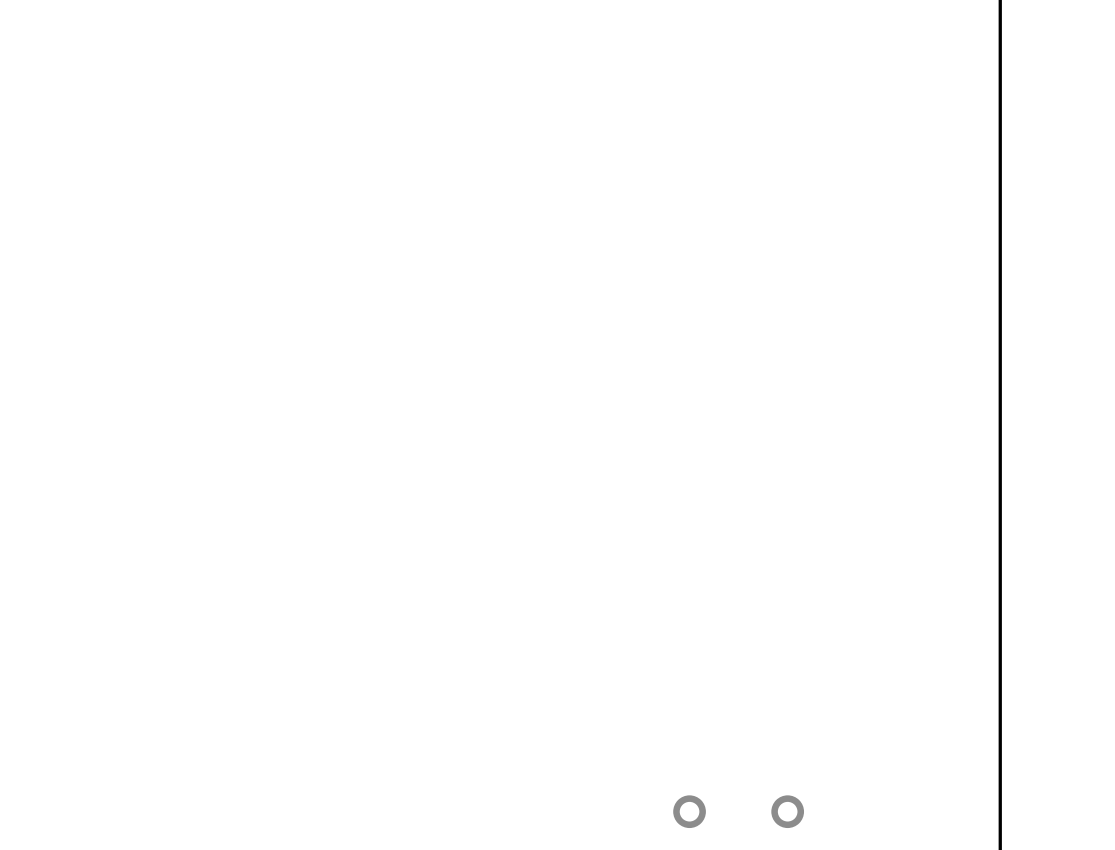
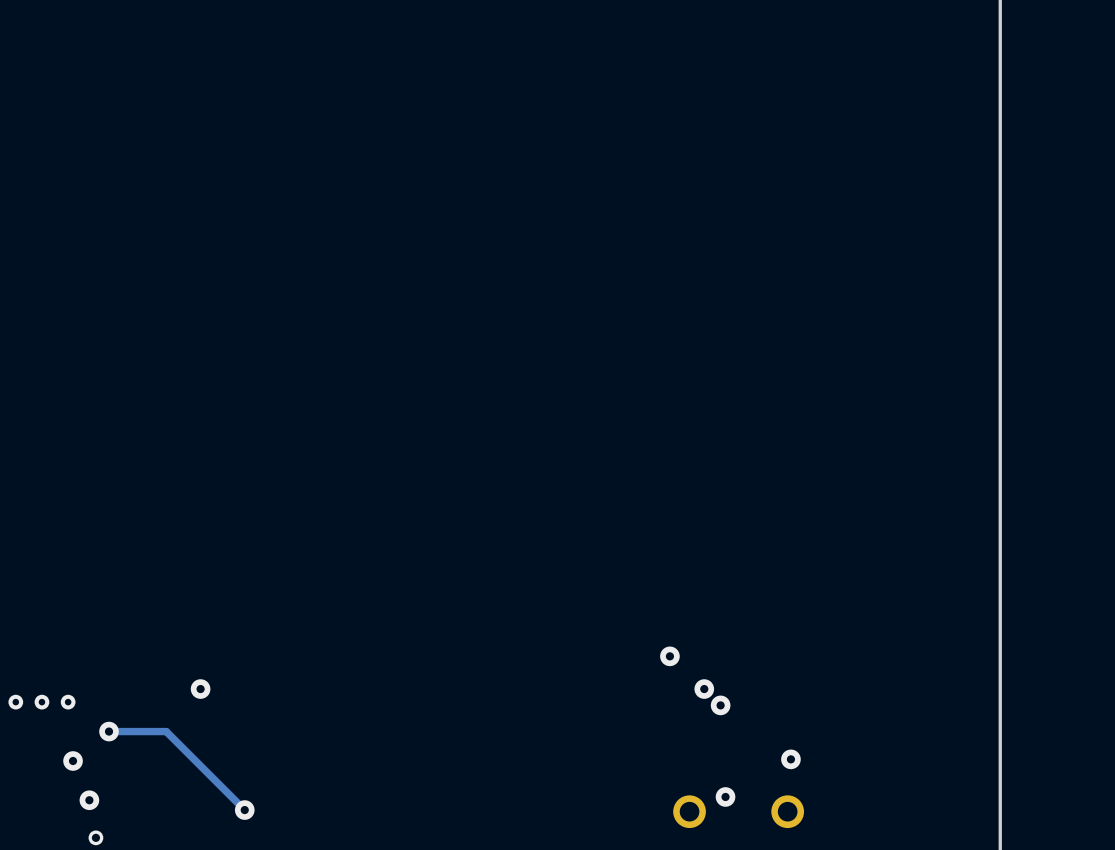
via: none -> (669, 656)
via: none -> (200, 689)
via: none -> (704, 689)
via: none -> (15, 702)
via: none -> (41, 702)
via: none -> (68, 702)
via: none -> (720, 705)
track: none -> (109, 731) (166, 731) (244, 810)
via: none -> (109, 731)
via: none -> (790, 759)
via: none -> (73, 761)
via: none -> (725, 796)
via: none -> (89, 800)
via: none -> (244, 810)
via: none -> (95, 837)

